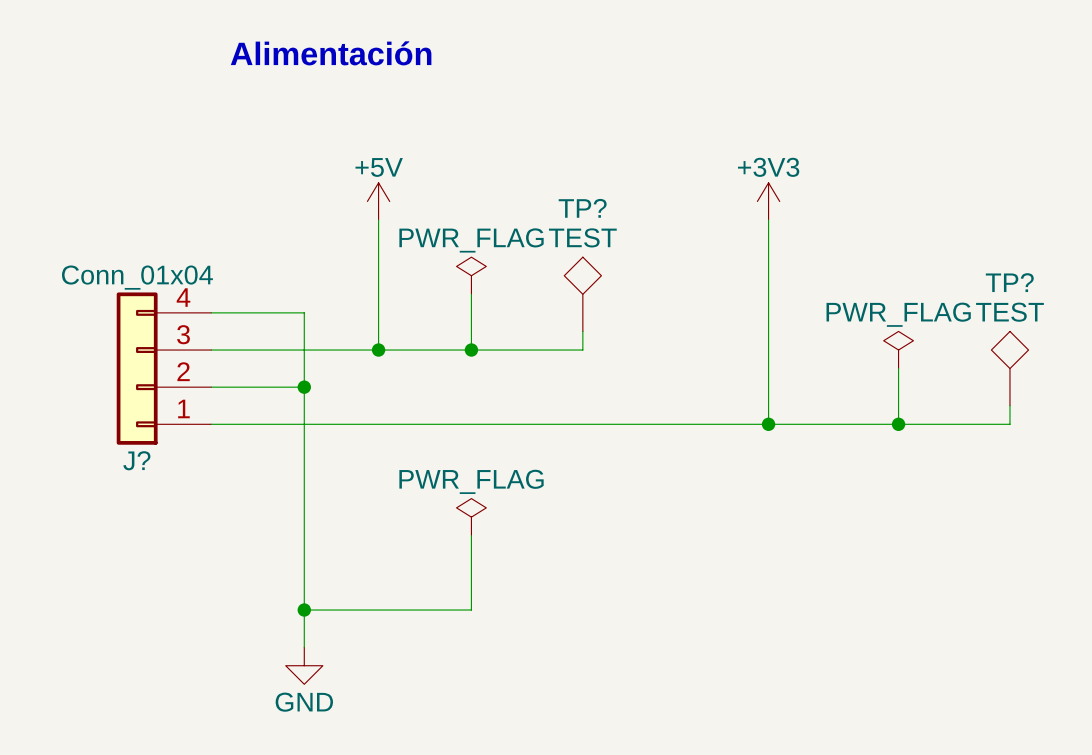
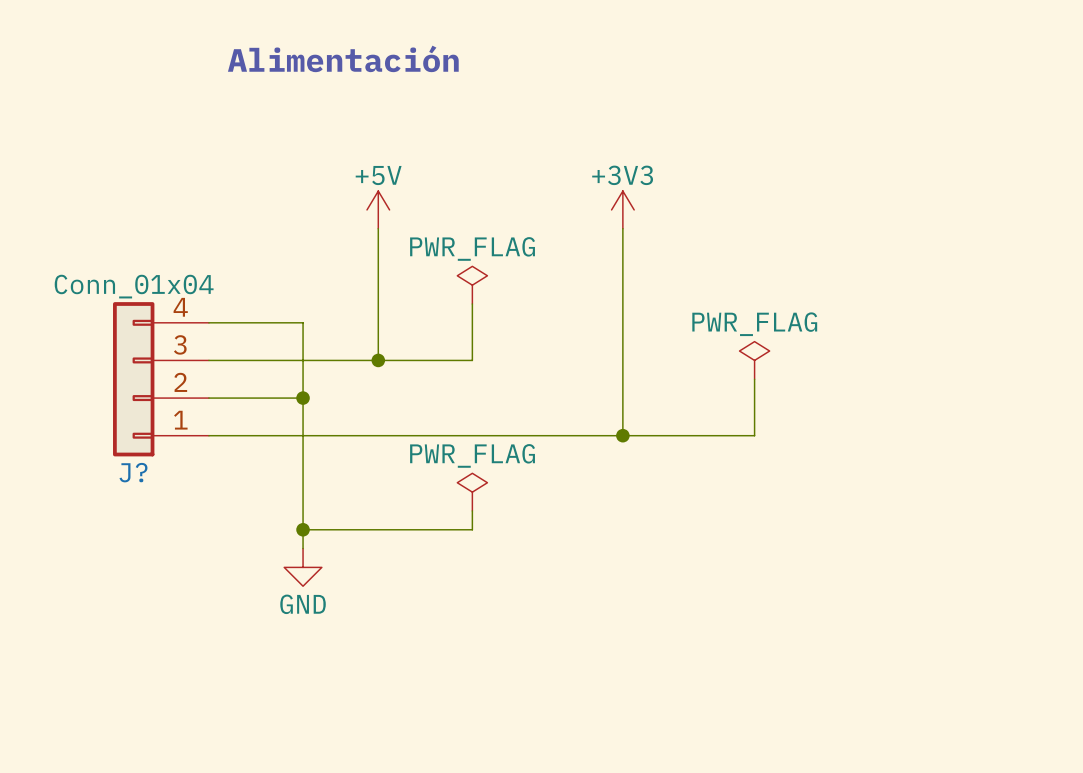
power symbol position: +3V3 (768, 201) -> +3V3 (622, 209)
wire: (768, 220) (768, 424) -> (622, 228) (622, 435)
TP?: TEST (582, 294) -> none
wire: (582, 331) (582, 350) (471, 350) -> none
junction: (471, 350) -> none
power symbol position: PWR_FLAG (898, 350) -> PWR_FLAG (754, 360)
wire: (898, 368) (898, 424) -> none
TP?: TEST (1009, 368) -> none
wire: (1009, 405) (1009, 424) (749, 424) -> (754, 379) (754, 435)
junction: none -> (622, 435)
junction: (768, 424) -> none
junction: (898, 424) -> none
wire: none -> (472, 510) (472, 529) (303, 529)
junction: none -> (303, 529)
power symbol position: PWR_FLAG (471, 517) -> PWR_FLAG (472, 492)
wire: (304, 535) (304, 647) -> none
wire: (471, 535) (471, 610) (304, 610) -> none
junction: (304, 610) -> none
power symbol position: GND (304, 665) -> GND (303, 567)

